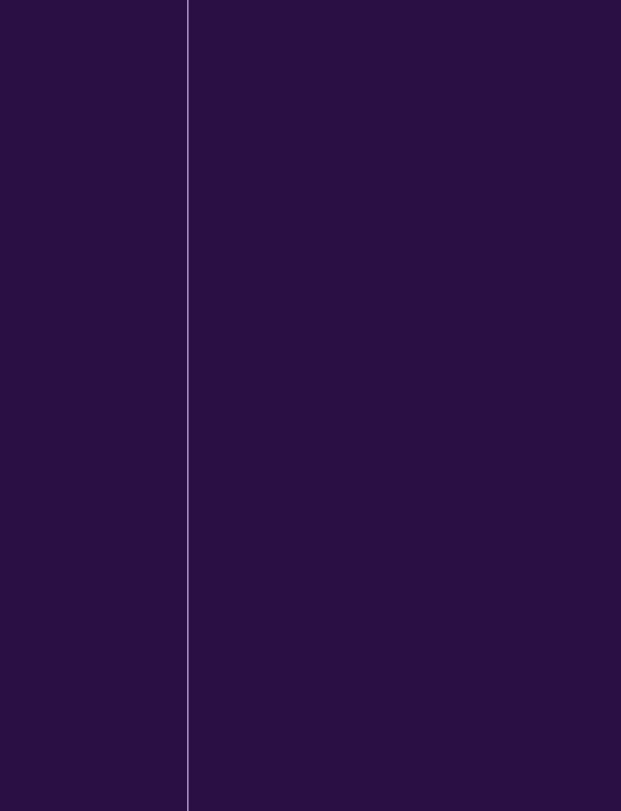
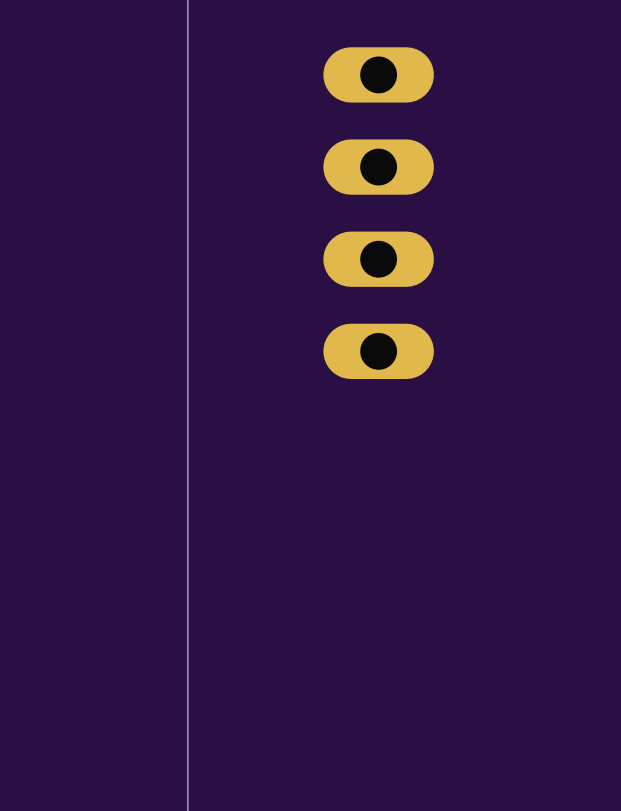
part: none -> (378, 213)

